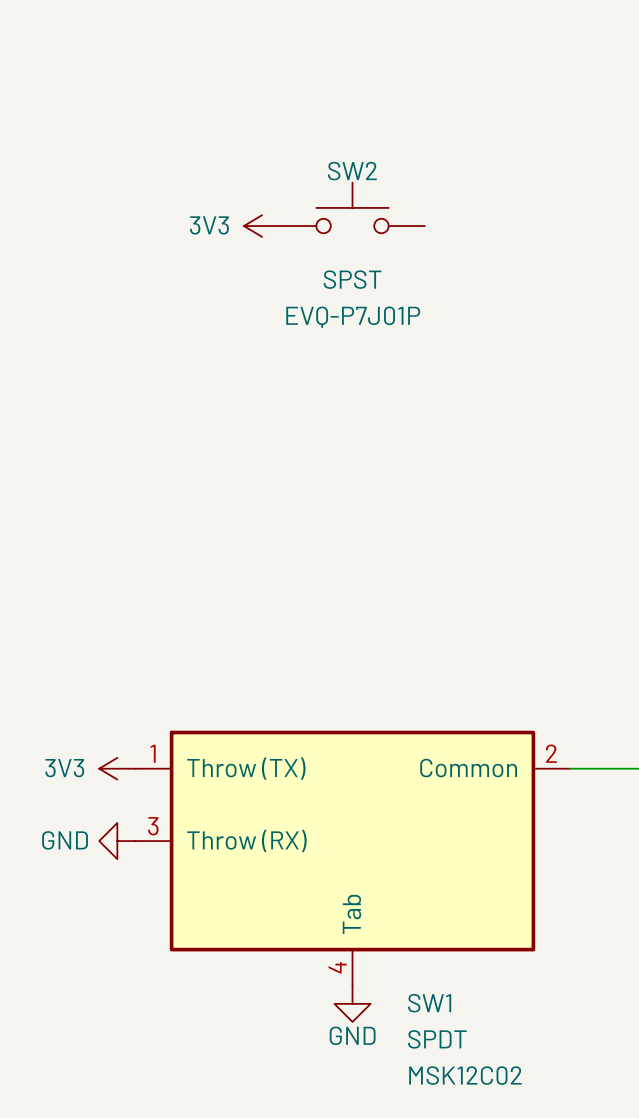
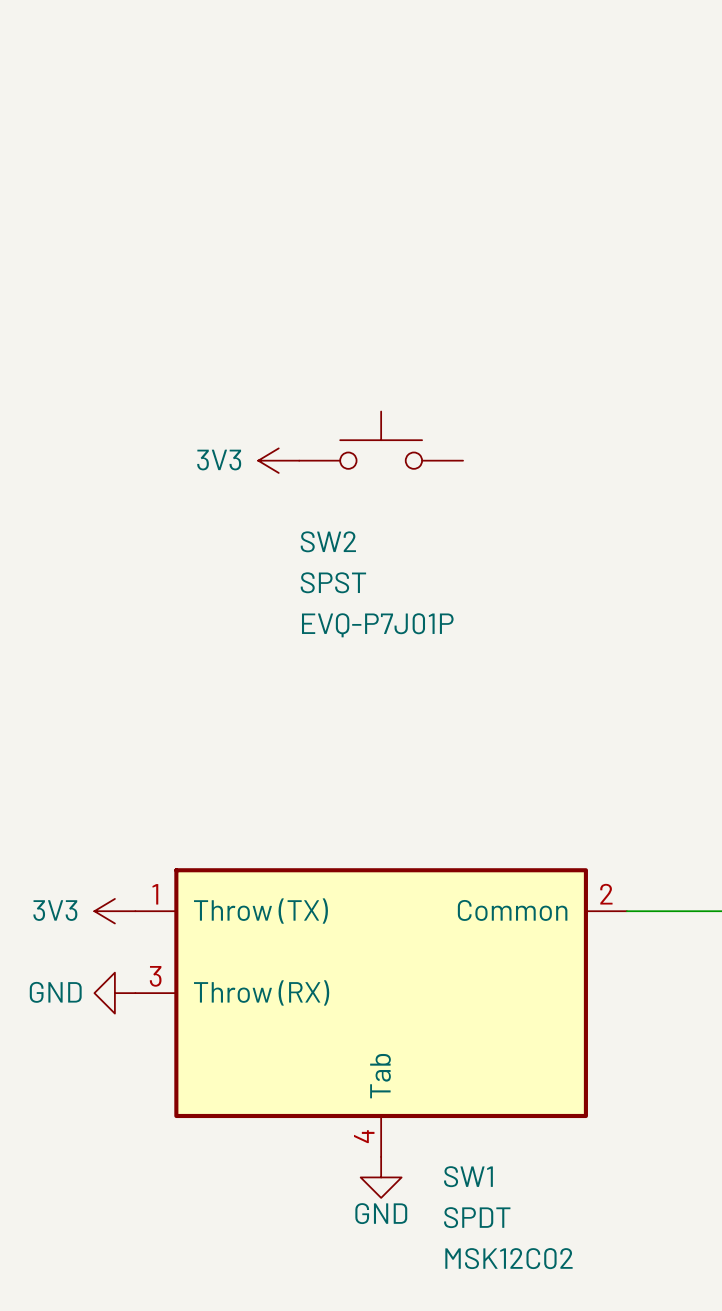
SW2 name position: SW2 (352, 171) -> SW2 (328, 541)
SW2 position: (352, 207) -> (381, 440)
power symbol position: 3V3 (262, 226) -> 3V3 (278, 460)
SW2 value position: SPST (352, 279) -> SPST (333, 582)
SW2 text position: EVQ-P7J01P (353, 317) -> EVQ-P7J01P (377, 625)

